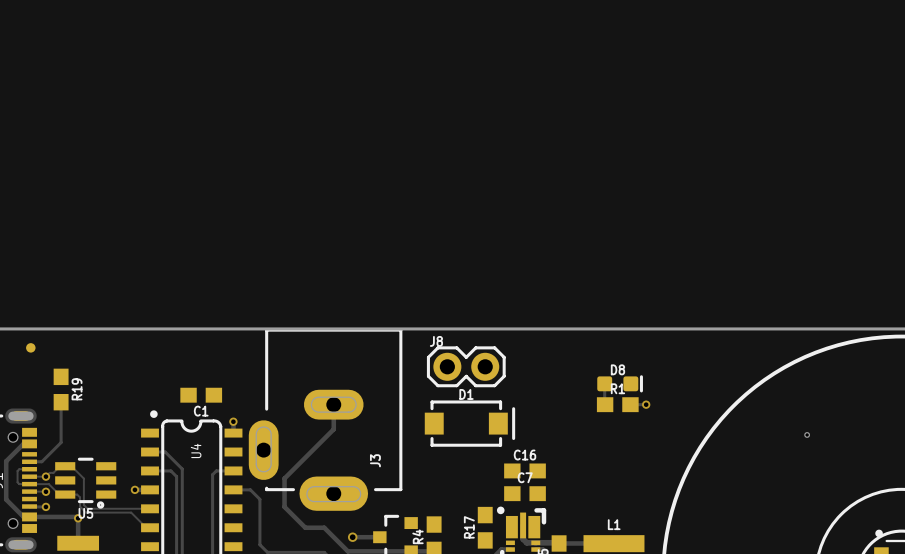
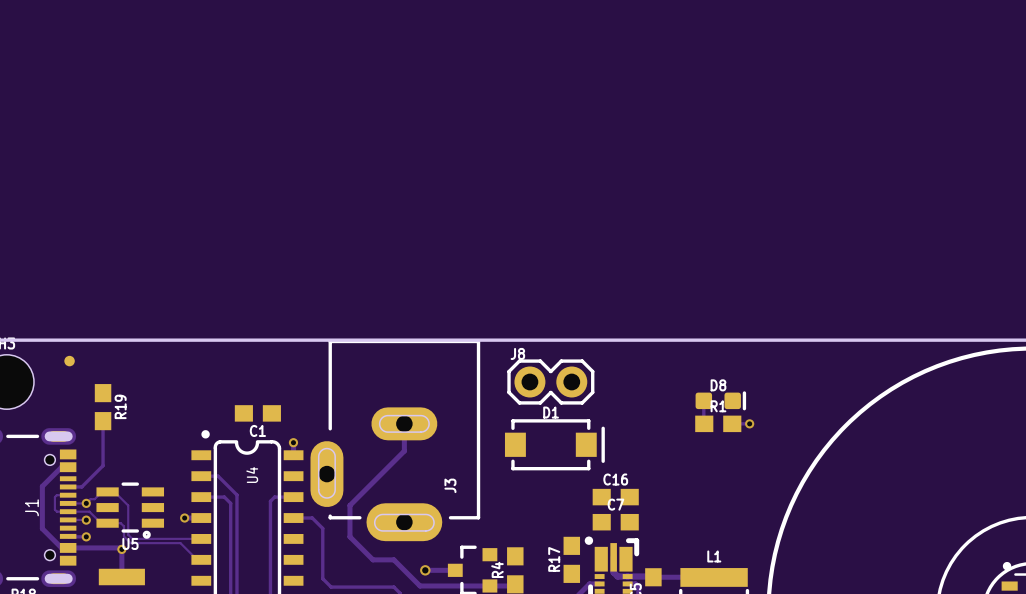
hole: (807, 434) -> none

